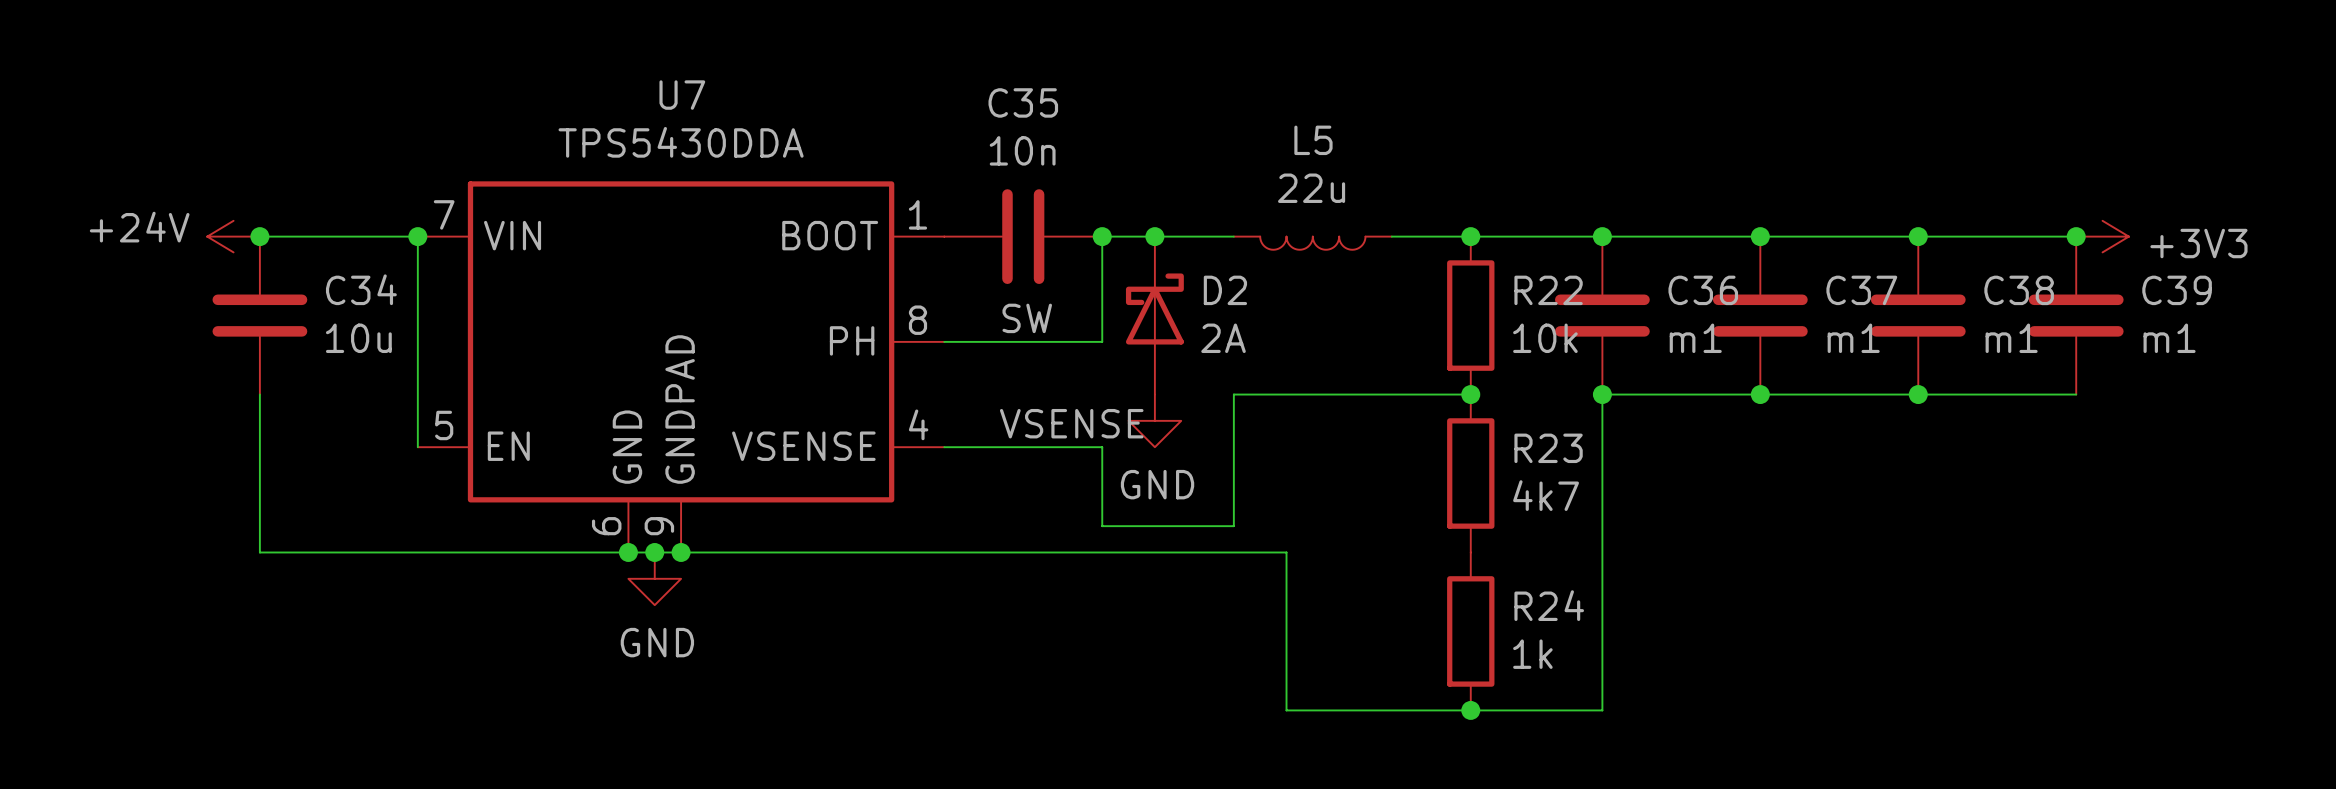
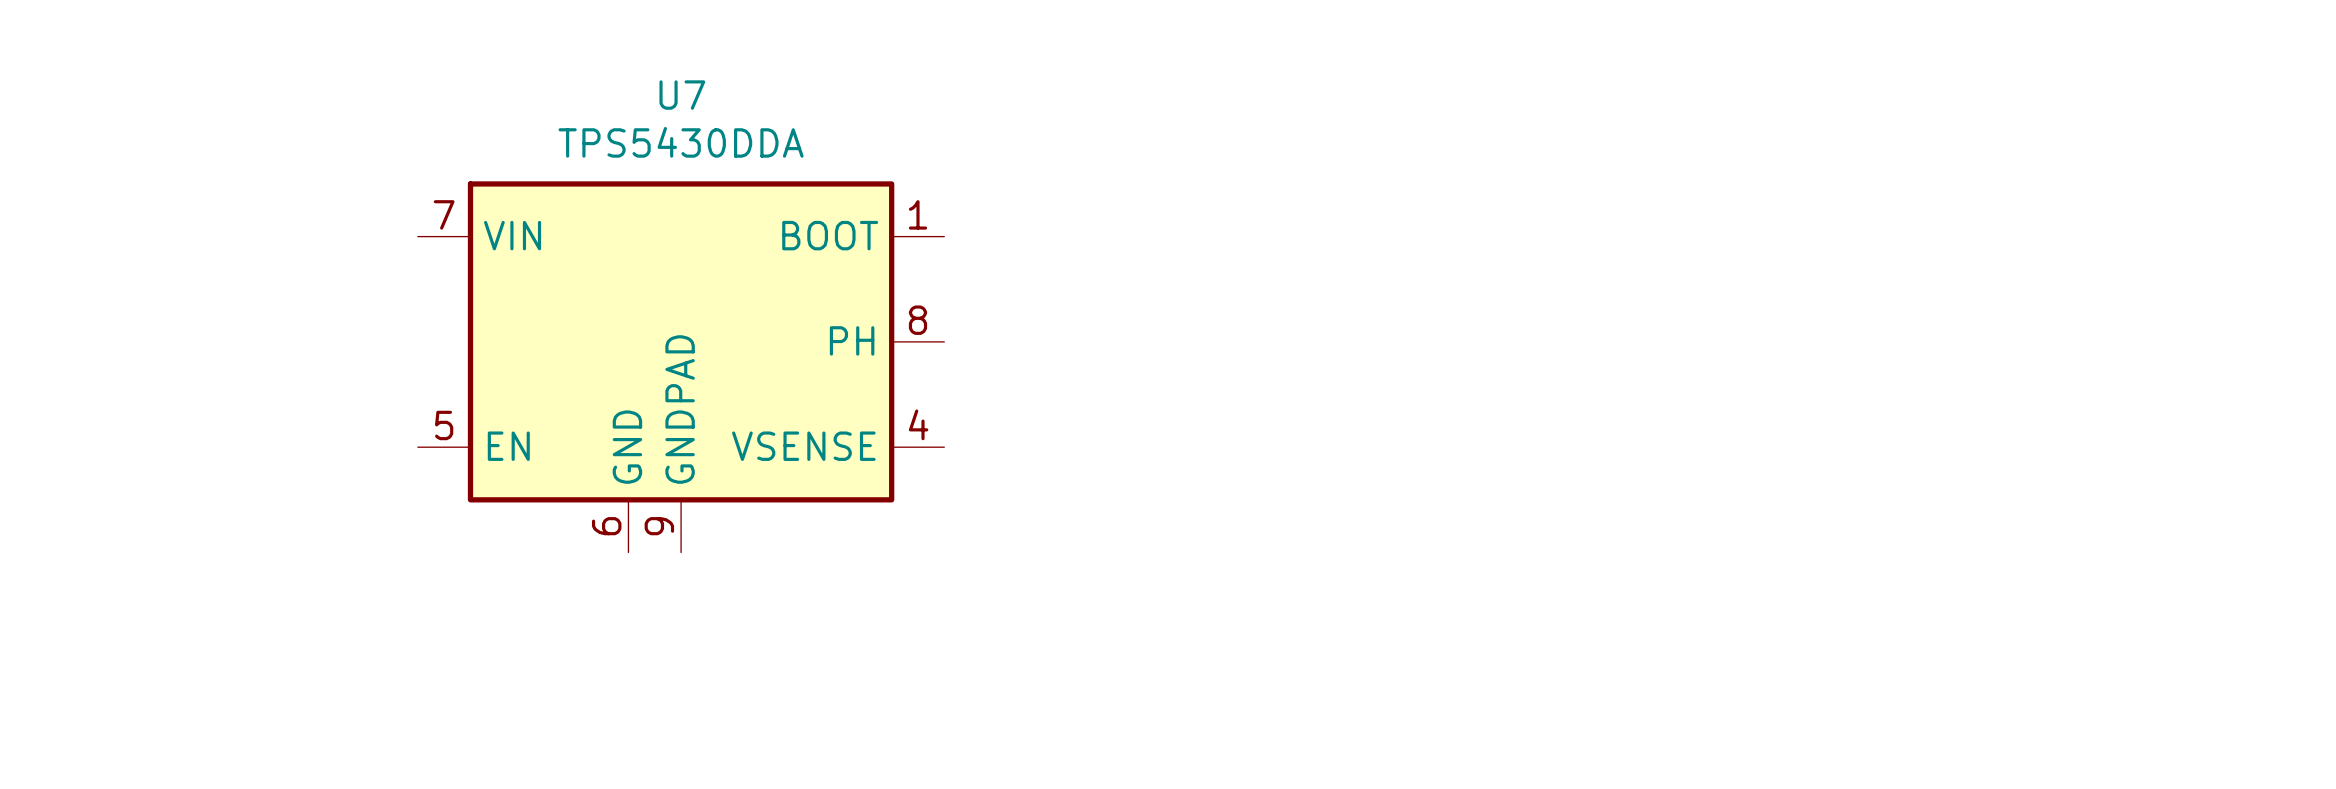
power symbol: +24V (233, 236) -> none
wire: (259, 236) (417, 236) (417, 447) -> none
junction: (259, 236) -> none
junction: (417, 236) -> none
C35: 10n (1023, 236) -> none
junction: (1102, 236) -> none
junction: (1154, 236) -> none
wire: (1233, 236) (1102, 236) (1102, 341) (944, 341) -> none
wire: (1391, 236) (2076, 236) -> none
junction: (1470, 236) -> none
junction: (1602, 236) -> none
junction: (1760, 236) -> none
junction: (1918, 236) -> none
junction: (2076, 236) -> none
power symbol: +3V3 (2102, 236) -> none
L5: 22u (1312, 243) -> none
C34: 10u (259, 315) -> none
D2: 2A (1154, 315) -> none
R22: 10k (1470, 315) -> none
C36: m1 (1602, 315) -> none
C37: m1 (1760, 315) -> none
C38: m1 (1918, 315) -> none
C39: m1 (2076, 315) -> none
label: SW (1027, 318) -> none
wire: (259, 394) (259, 552) (1286, 552) (1286, 710) (1602, 710) (1602, 394) (2076, 394) -> none
wire: (1470, 394) (1233, 394) (1233, 526) (1102, 526) (1102, 447) (944, 447) -> none
junction: (1470, 394) -> none
junction: (1602, 394) -> none
junction: (1760, 394) -> none
junction: (1918, 394) -> none
power symbol: GND (1154, 420) -> none
label: VSENSE (1071, 423) -> none
R23: 4k7 (1470, 473) -> none
junction: (628, 552) -> none
junction: (654, 552) -> none
junction: (681, 552) -> none
power symbol: GND (654, 578) -> none
R24: 1k (1470, 631) -> none
junction: (1470, 710) -> none

